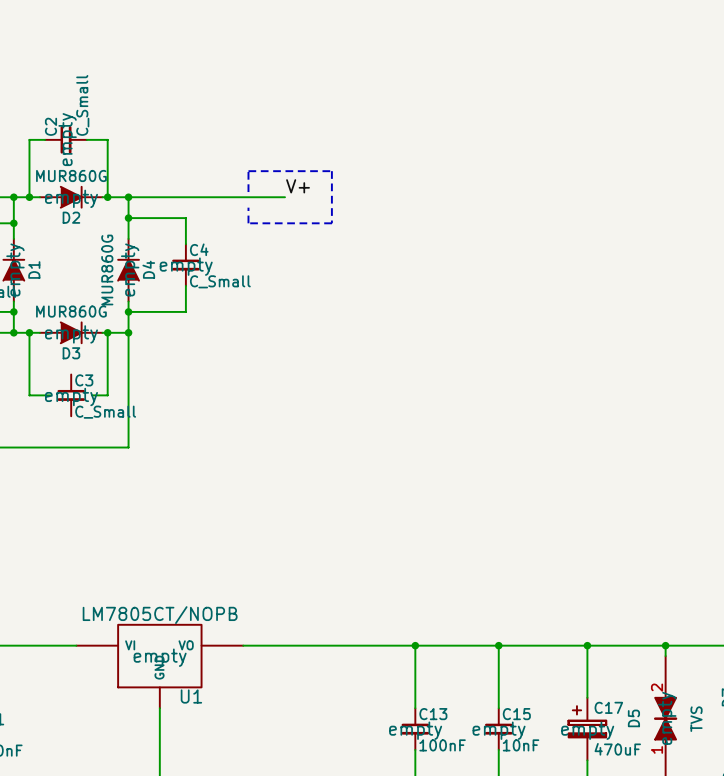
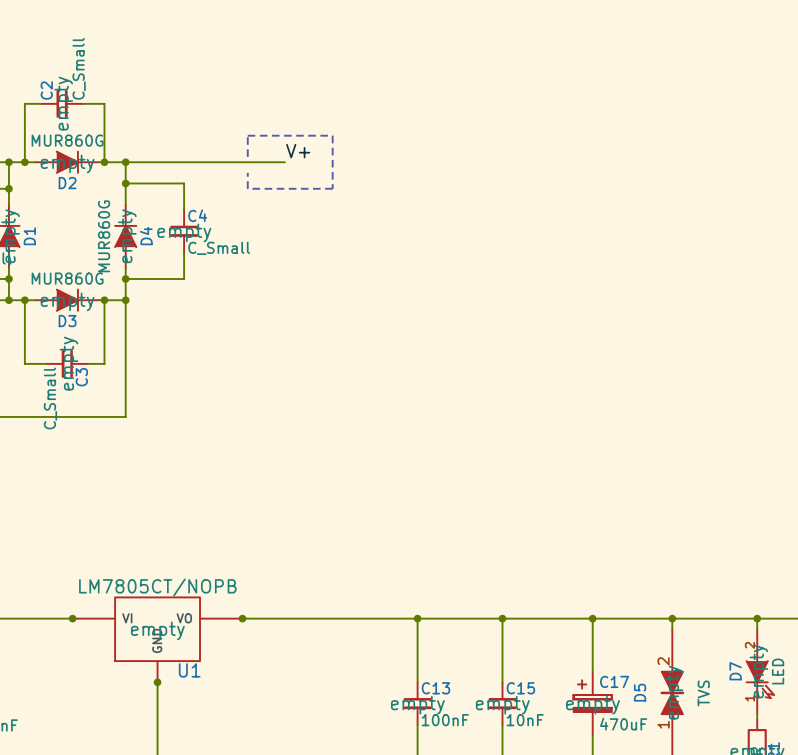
C3 rotation: 0° (71, 395) -> 90° clockwise (67, 363)
junction: none -> (72, 618)
junction: none -> (242, 618)
junction: none -> (157, 682)

